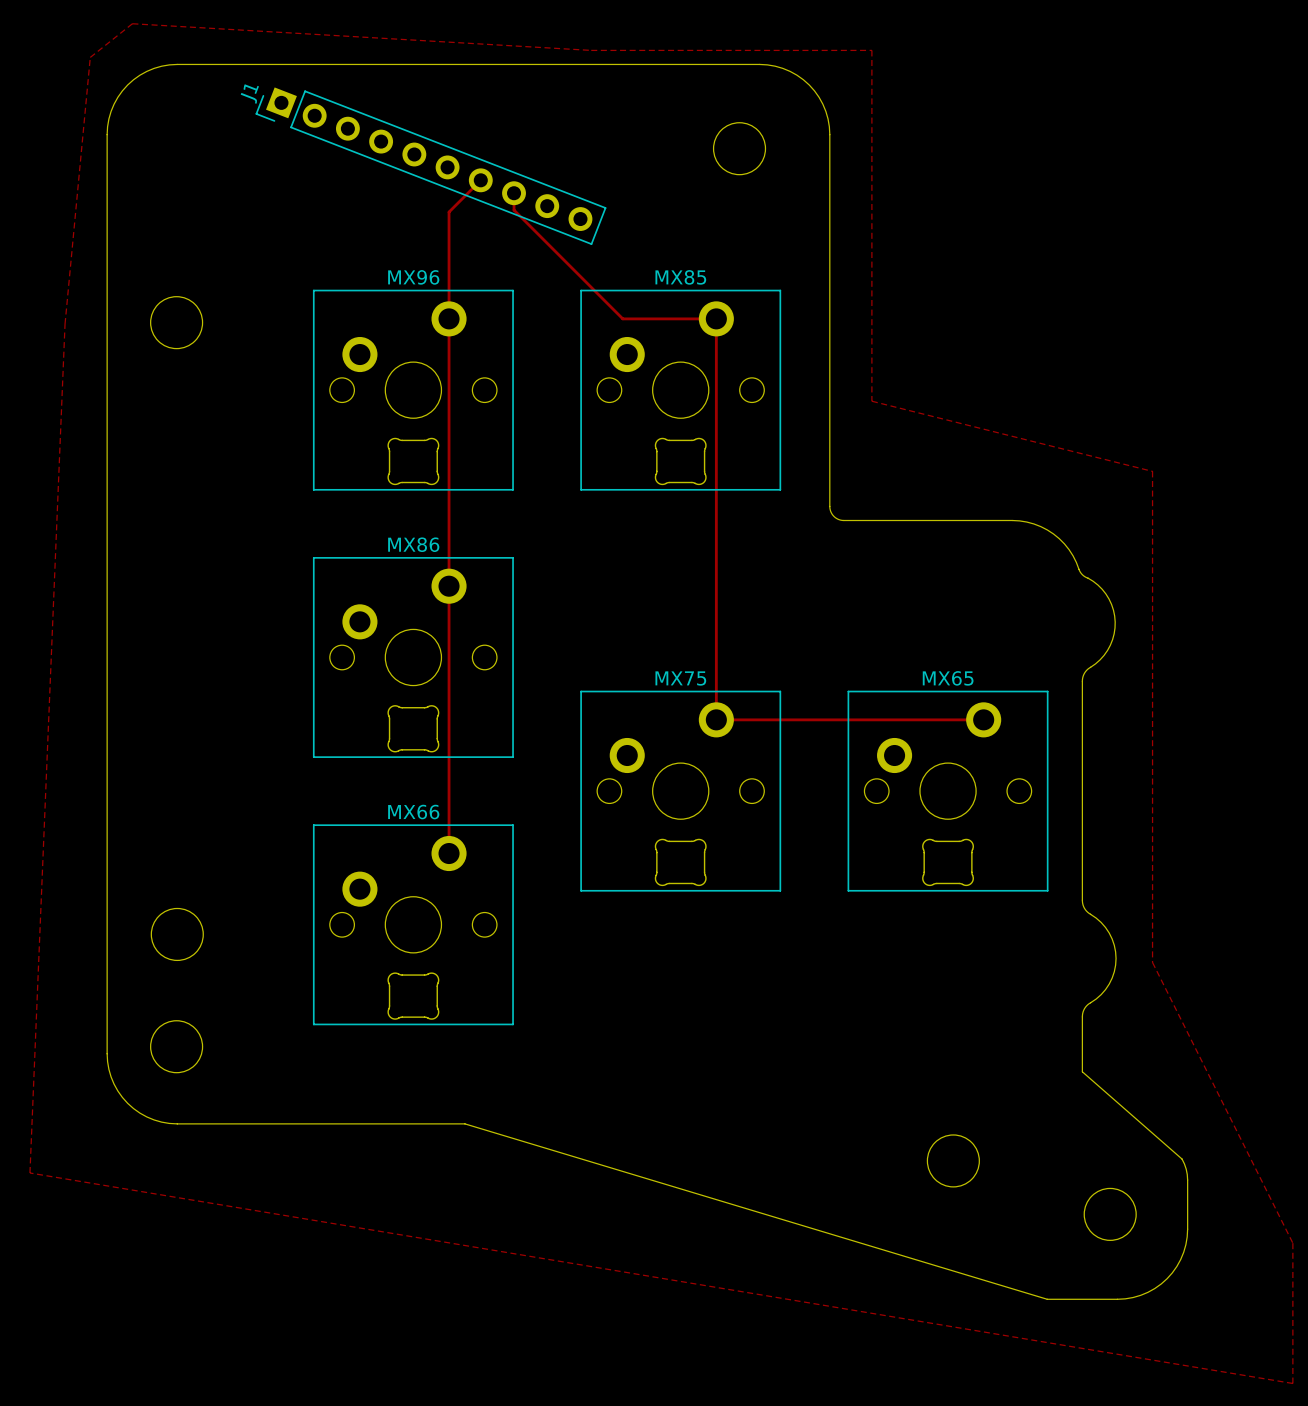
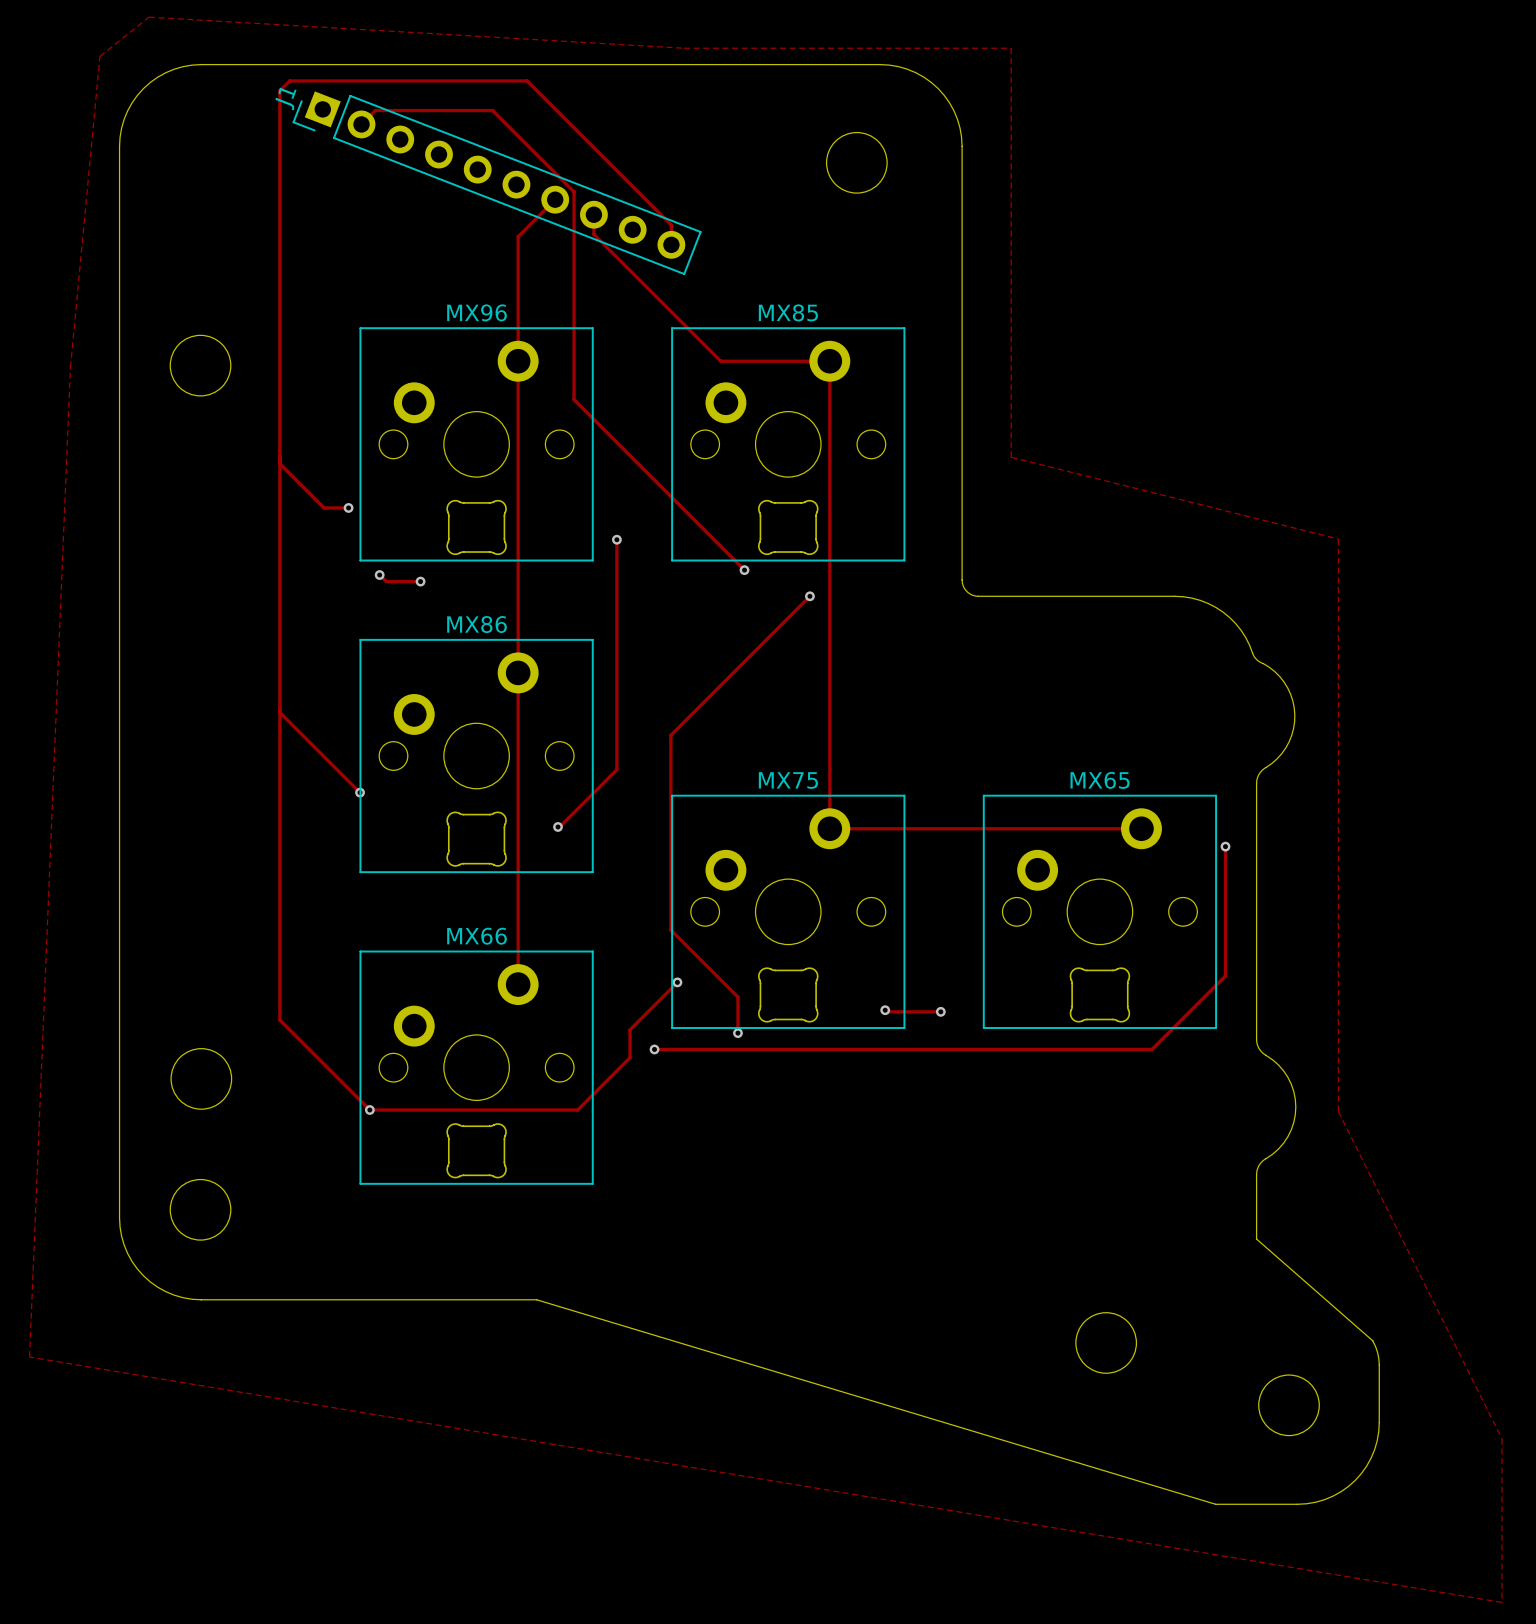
track: none -> (361, 124) (375, 110) (492, 110) (574, 191) (574, 399) (744, 570)
track: none -> (671, 244) (671, 225) (527, 80) (289, 80) (279, 90) (279, 1020) (369, 1110) (577, 1110) (629, 1057) (629, 1029) (677, 982)
track: none -> (279, 463) (324, 507) (348, 507)
via: none -> (348, 507)
track: none -> (616, 539) (616, 769) (558, 826)
via: none -> (616, 539)
via: none -> (744, 570)
track: none -> (379, 575) (386, 581) (420, 581)
via: none -> (379, 575)
via: none -> (420, 581)
track: none -> (809, 596) (670, 735) (670, 930) (737, 997) (737, 1033)
via: none -> (809, 596)
track: none -> (279, 712) (360, 792)
via: none -> (360, 792)
via: none -> (558, 826)
track: none -> (1225, 846) (1225, 975) (1151, 1049) (654, 1049)
via: none -> (1225, 846)
via: none -> (677, 982)
track: none -> (885, 1010) (886, 1011) (940, 1011)
via: none -> (885, 1010)
via: none -> (940, 1011)
via: none -> (737, 1033)
via: none -> (654, 1049)
via: none -> (369, 1110)

